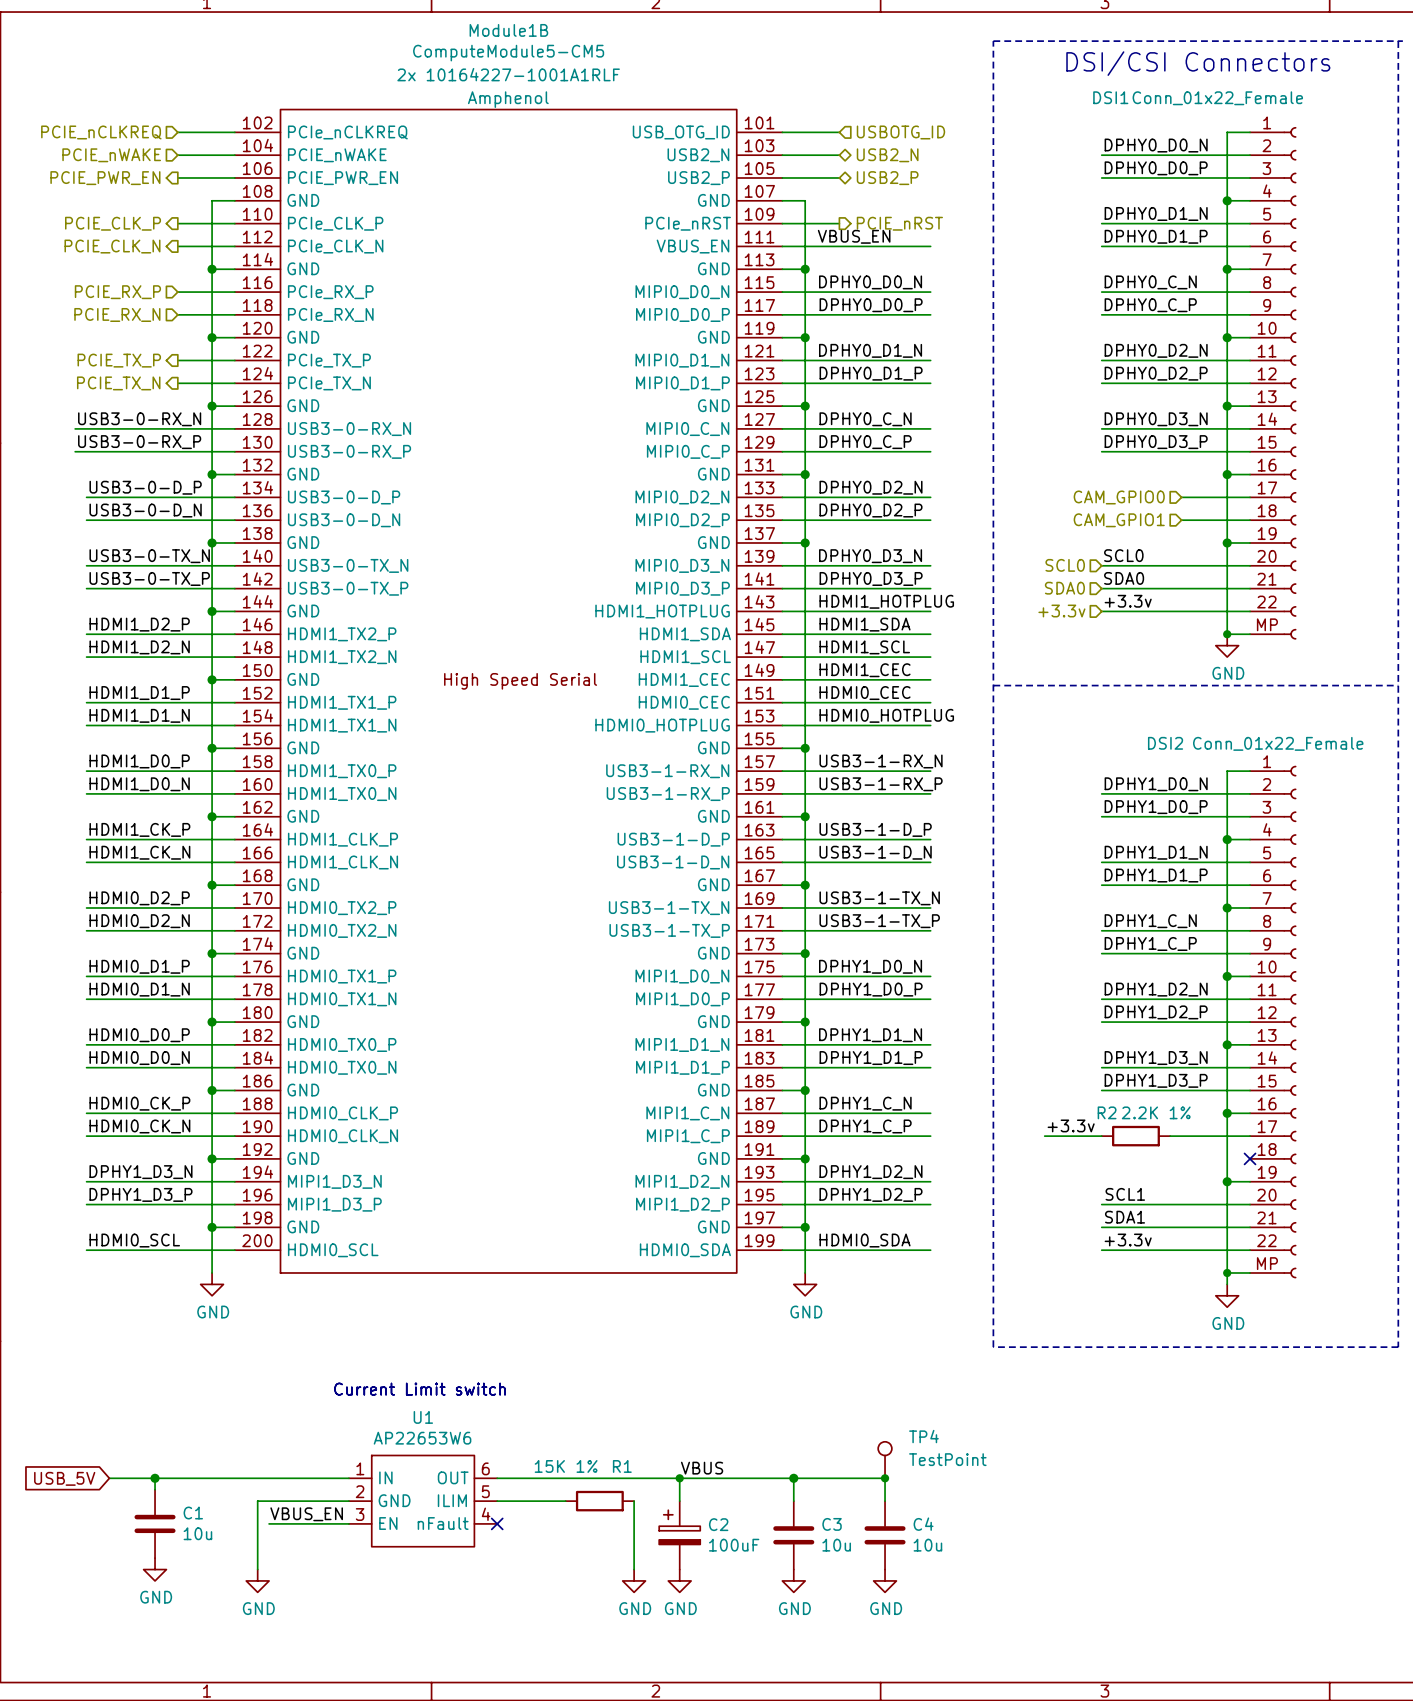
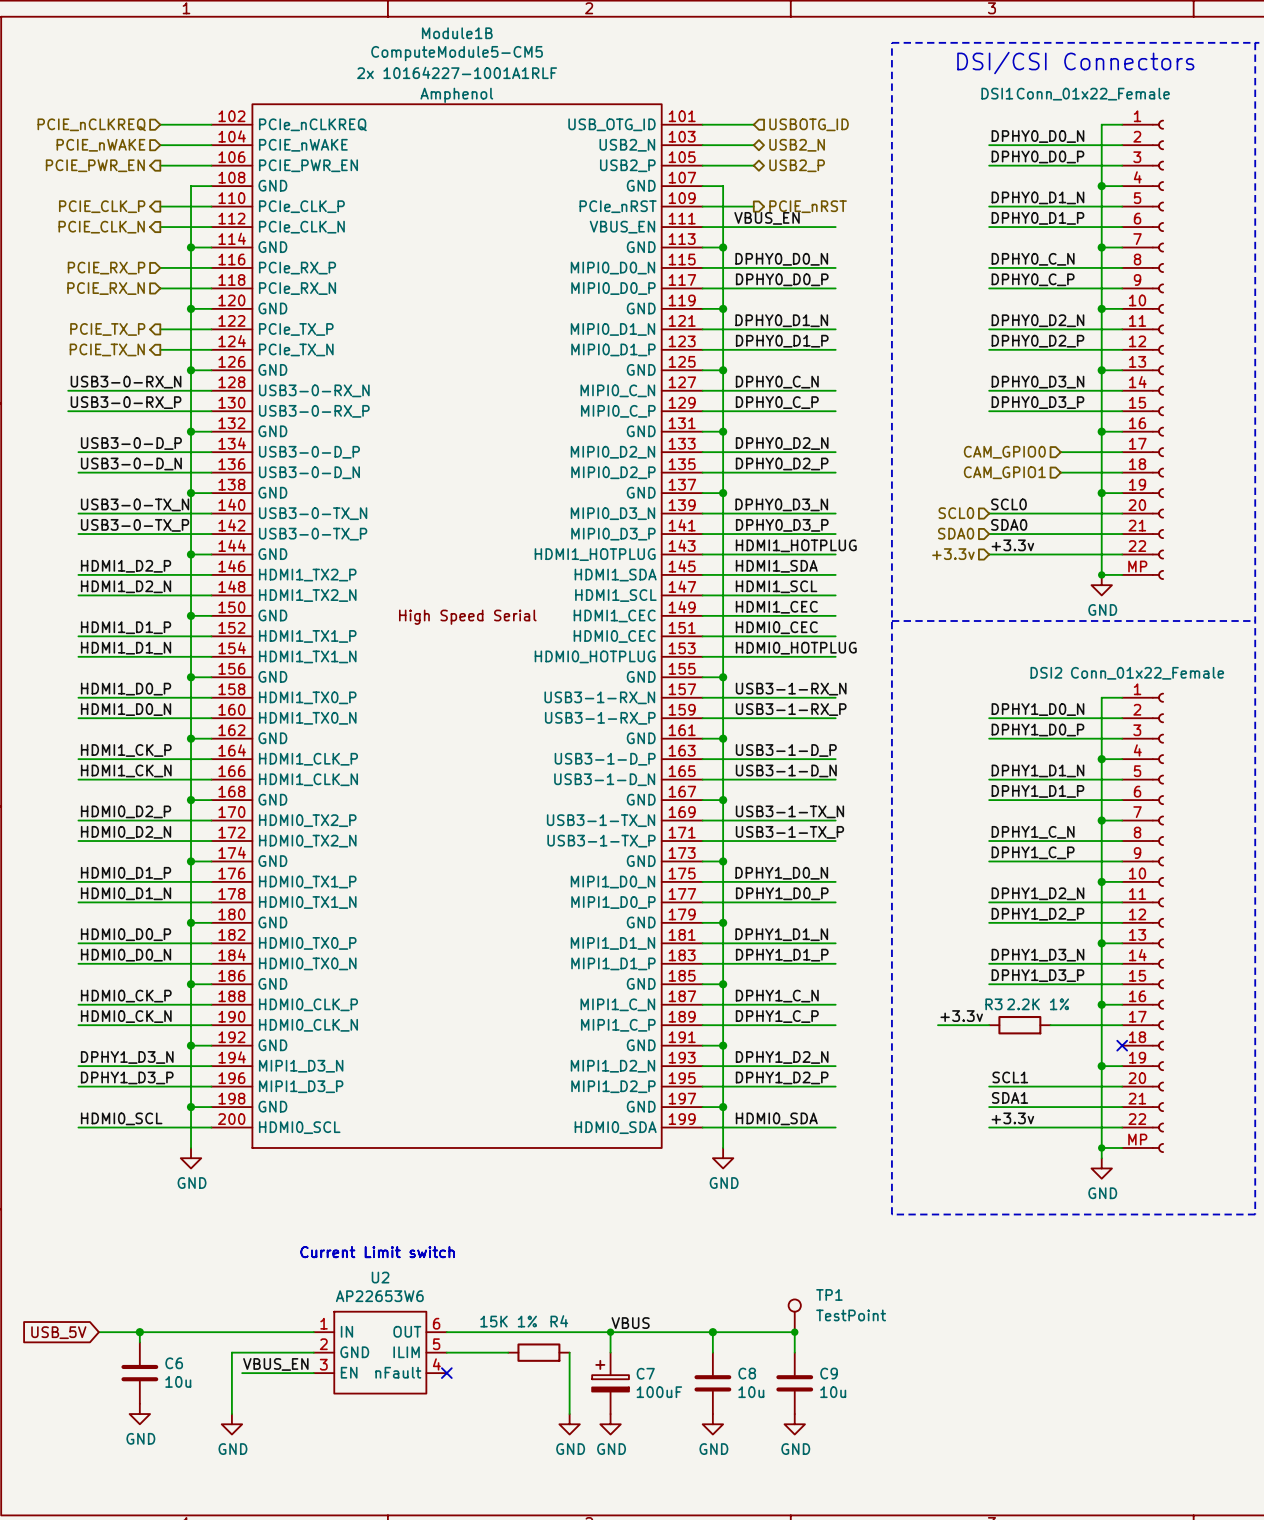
R2 name: R2 (1107, 1112) -> R3 (993, 1004)
U1 name: U1 (423, 1417) -> U2 (380, 1277)
TP4 name: TP4 (923, 1436) -> TP1 (829, 1294)
R1 name: R1 (622, 1466) -> R4 (559, 1321)
C1 name: C1 (193, 1513) -> C6 (174, 1363)
C2 name: C2 (718, 1524) -> C7 (645, 1373)
C3 name: C3 (832, 1524) -> C8 (747, 1373)
C4 name: C4 (923, 1524) -> C9 (829, 1373)

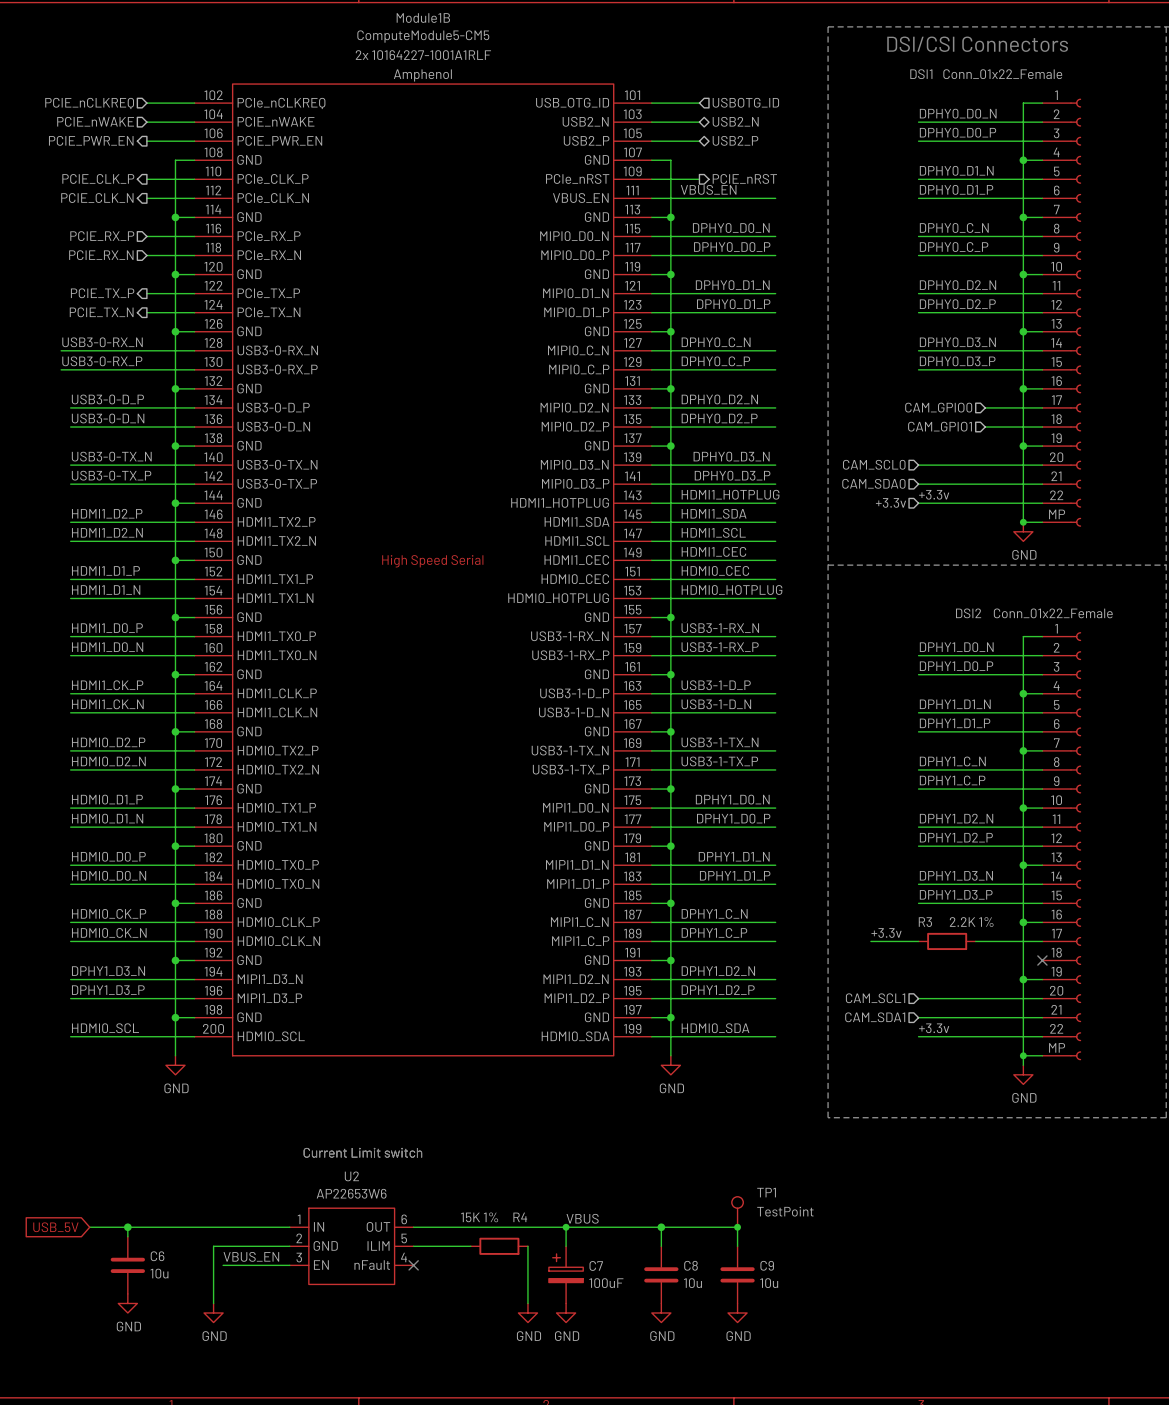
label: SCL0 (1008, 504) -> none
hierarchical label: SCL0 (956, 513) -> CAM_SCL0 (874, 464)
label: SDA0 (1009, 524) -> none
hierarchical label: SDA0 (956, 533) -> CAM_SDA0 (873, 483)
label: SCL1 (1010, 1077) -> none
hierarchical label: none -> CAM_SCL1 (875, 998)
label: SDA1 (1010, 1097) -> none
hierarchical label: none -> CAM_SDA1 (875, 1017)

